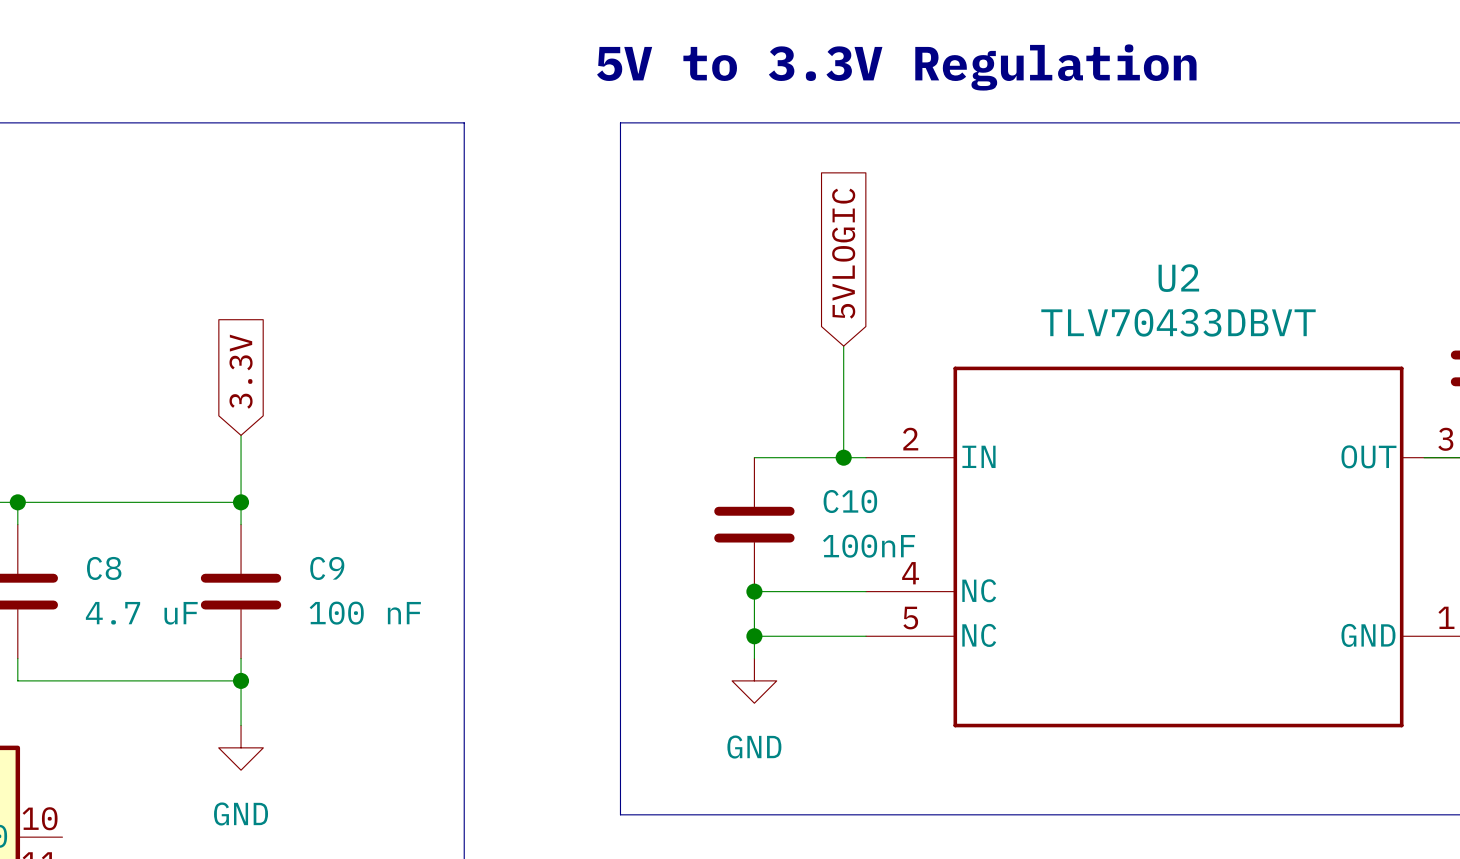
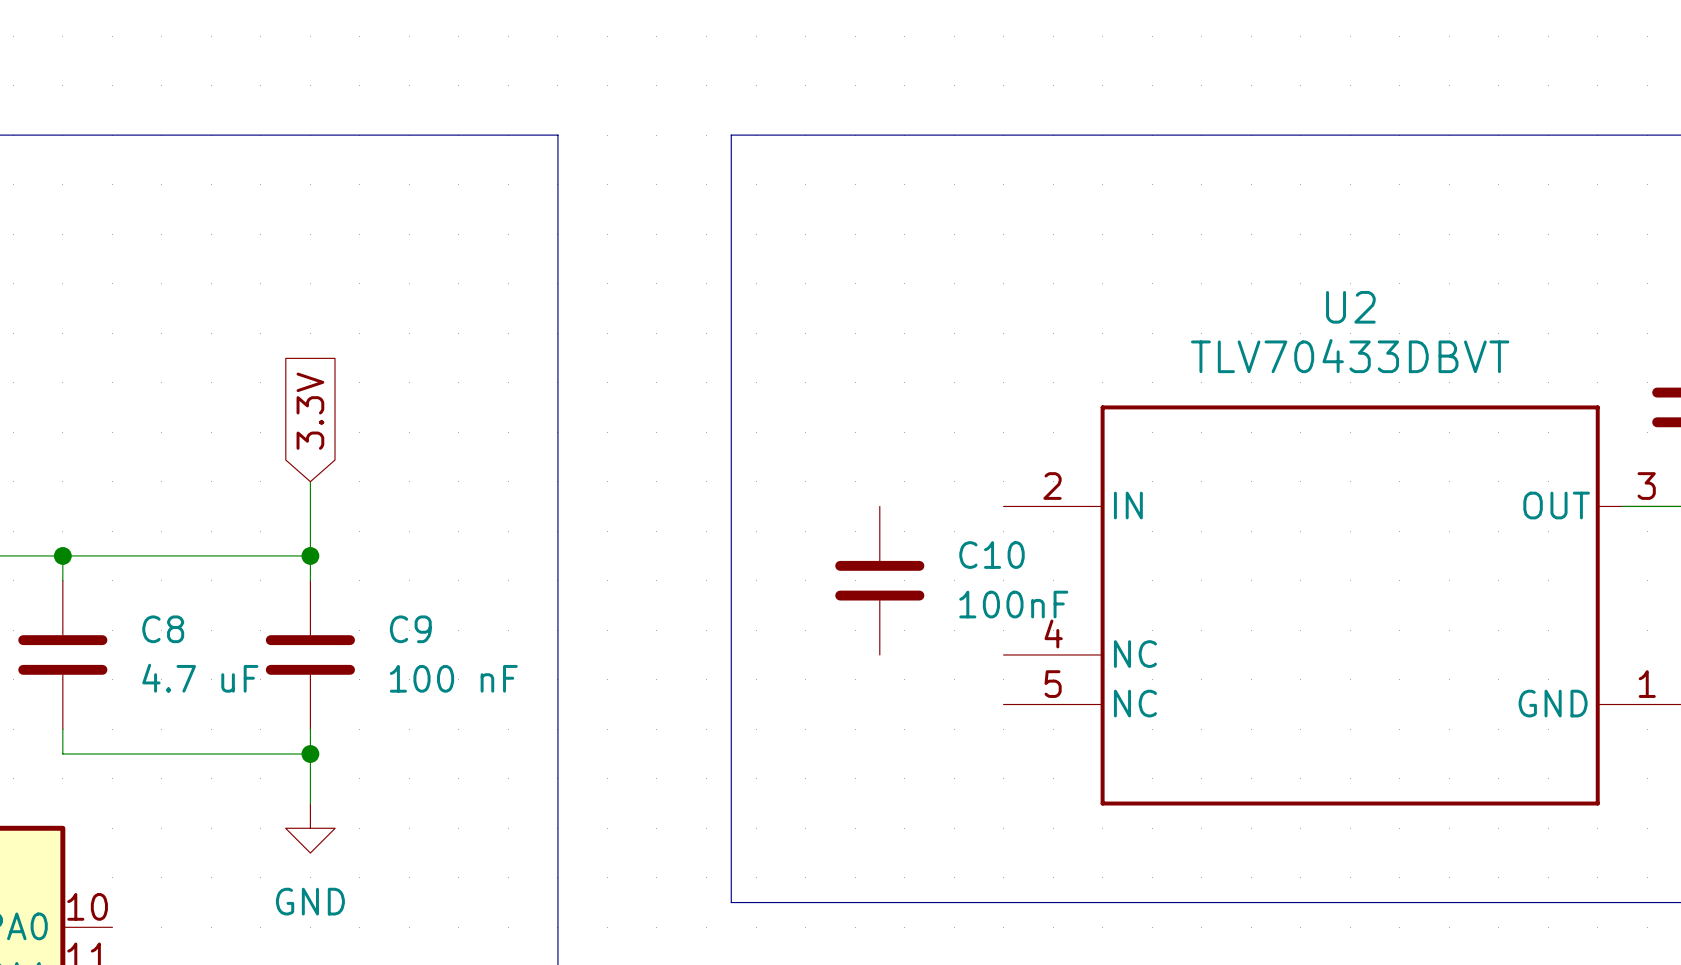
text: 5V to 3.3V Regulation (896, 67) -> none
global label: 5VLOGIC (843, 253) -> none
wire: (843, 346) (843, 457) -> none
wire: (754, 457) (866, 457) -> none
junction: (843, 457) -> none
junction: (754, 591) -> none
wire: (866, 591) (754, 591) (754, 658) -> none
wire: (754, 636) (866, 636) -> none
junction: (754, 636) -> none
power symbol: GND (754, 680) -> none

